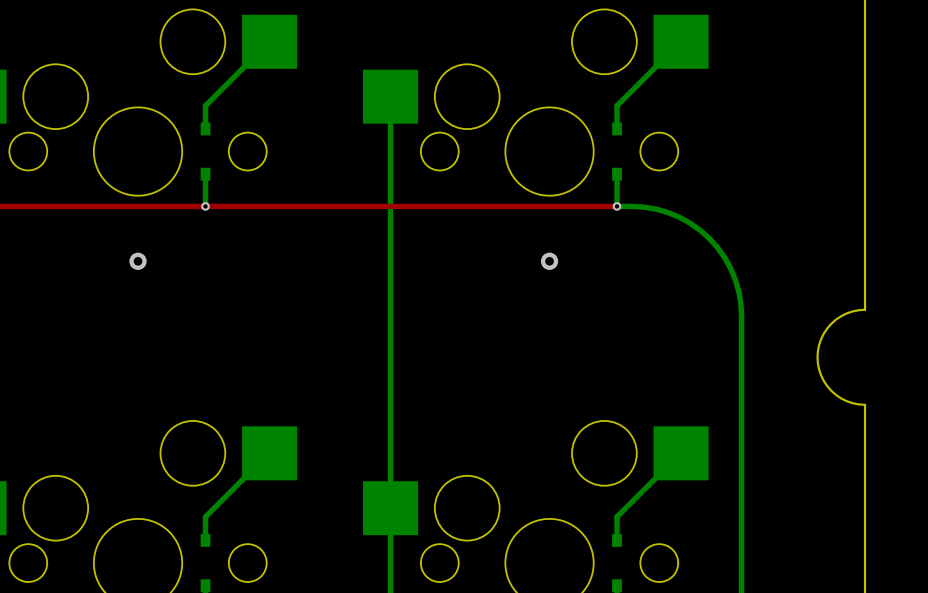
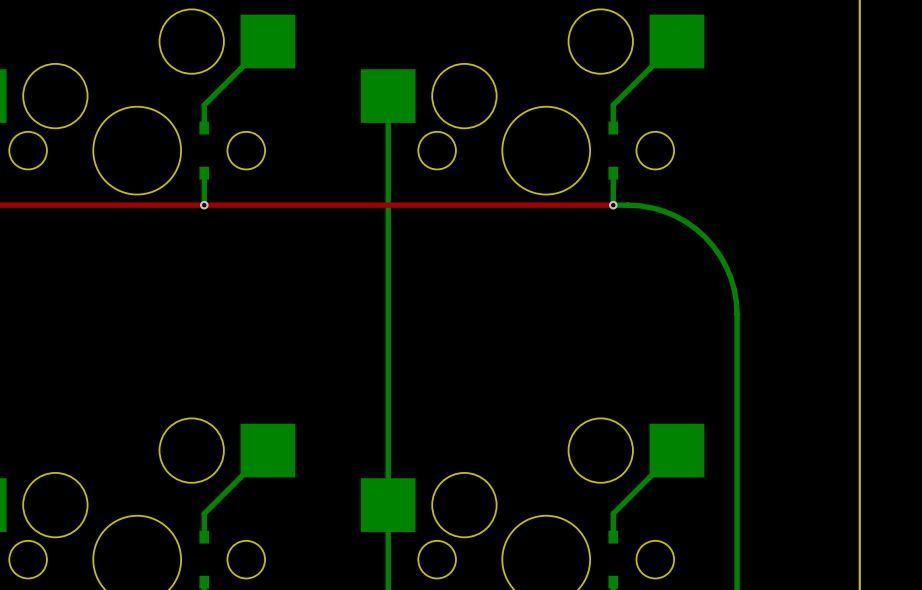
via: (138, 261) -> none
via: (549, 261) -> none
board edge: (865, 309) (846, 313) (831, 323) (821, 339) (817, 357) (821, 375) (831, 390) (846, 401) (865, 404) -> (859, 307) (859, 402)

